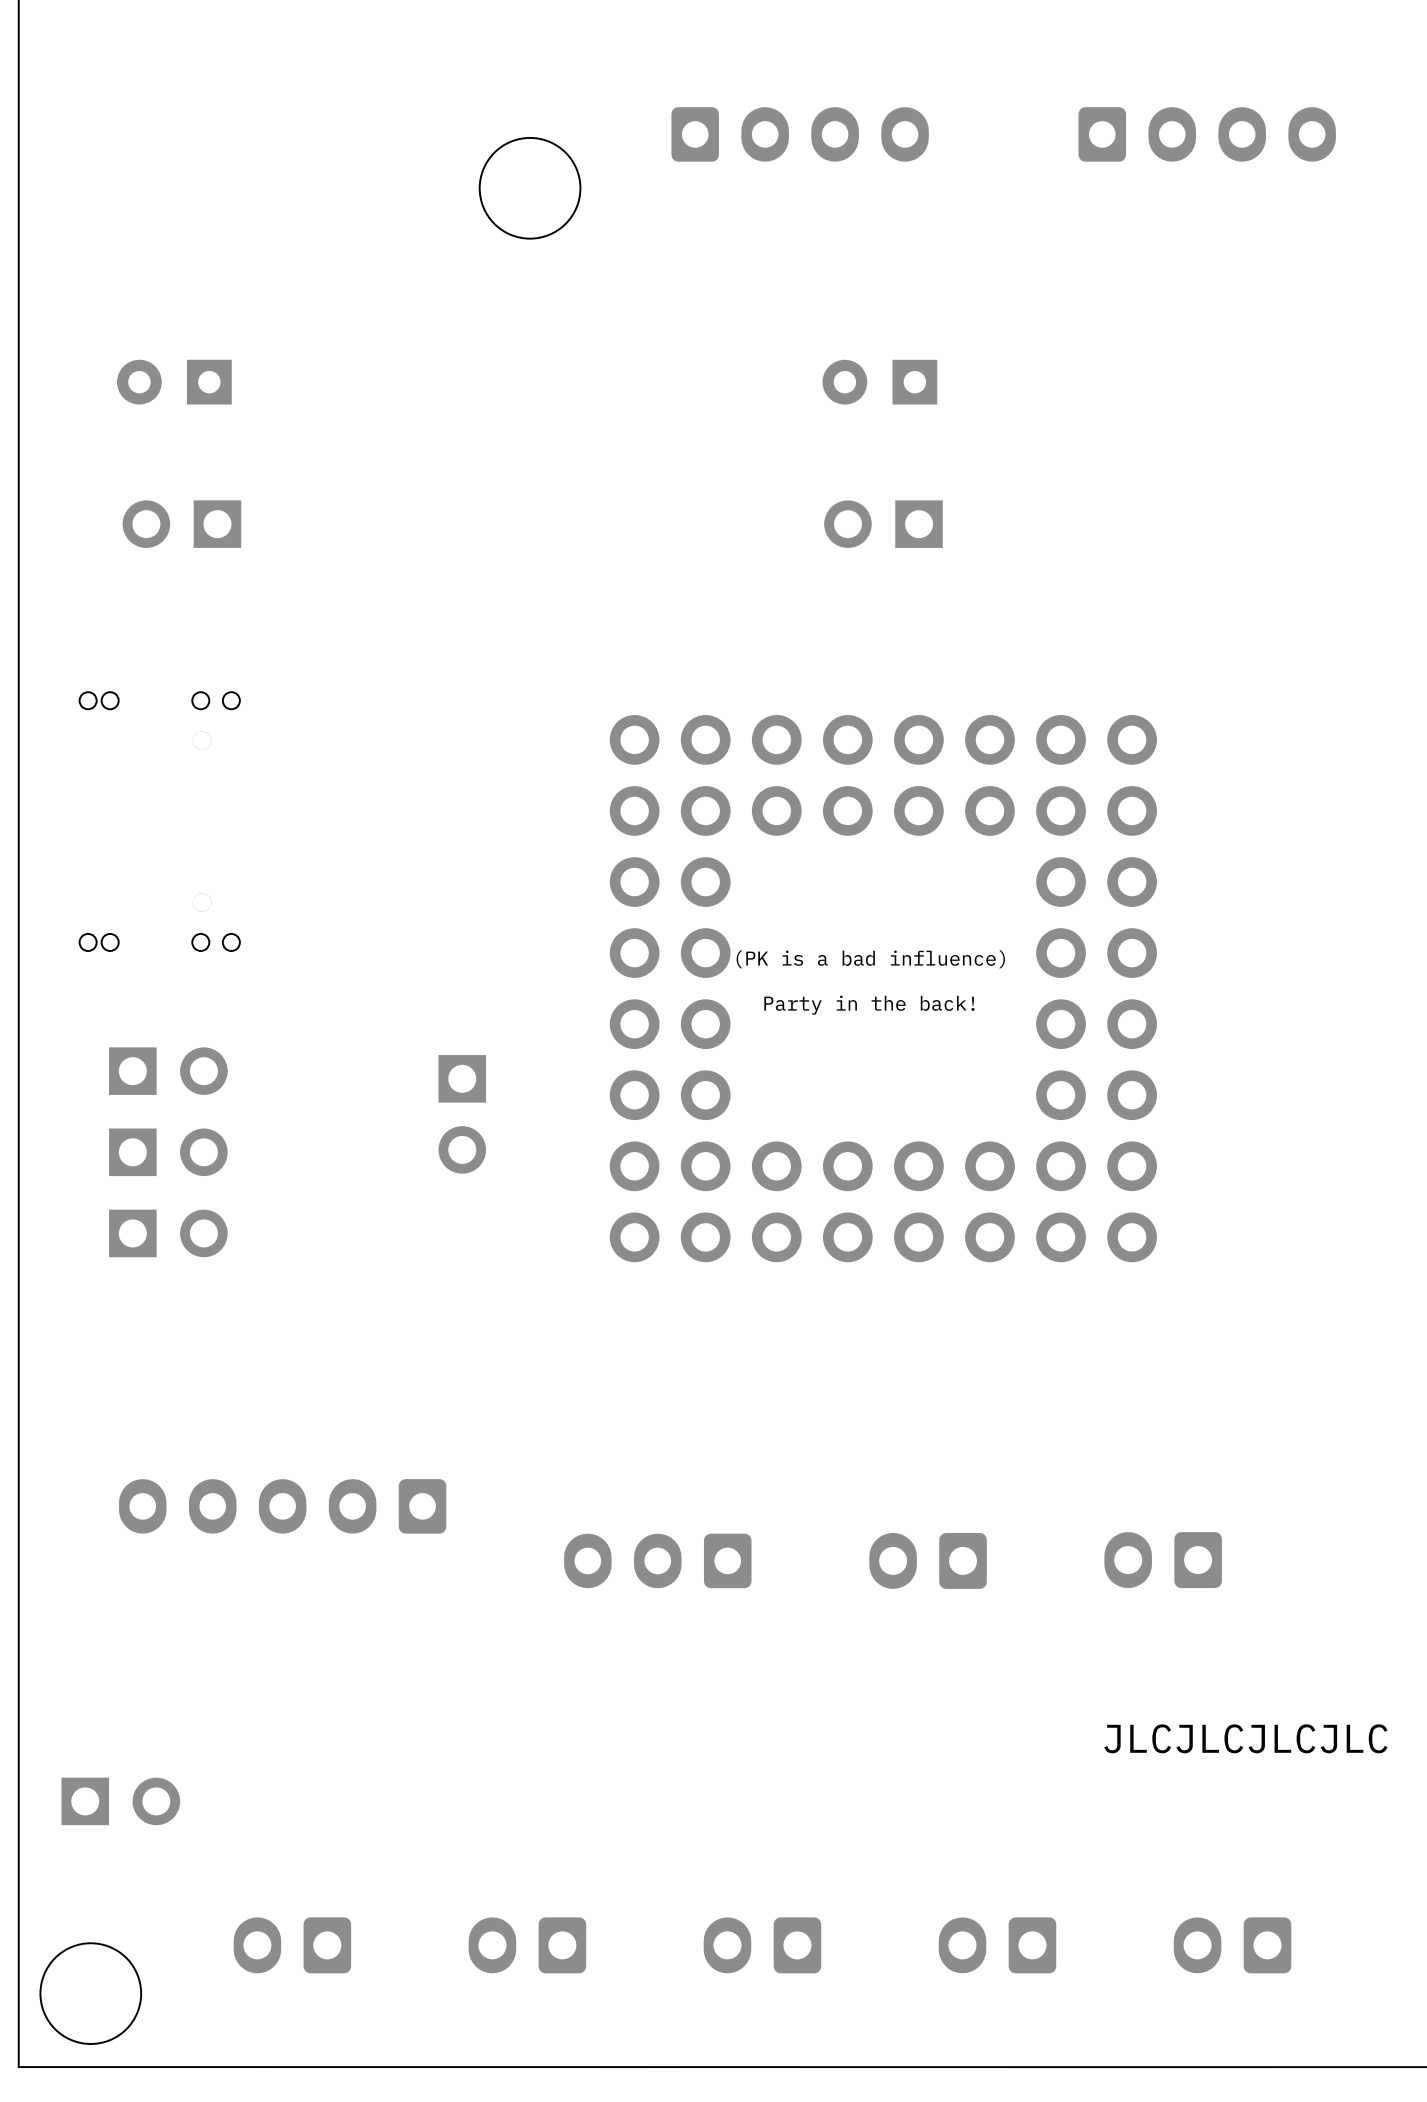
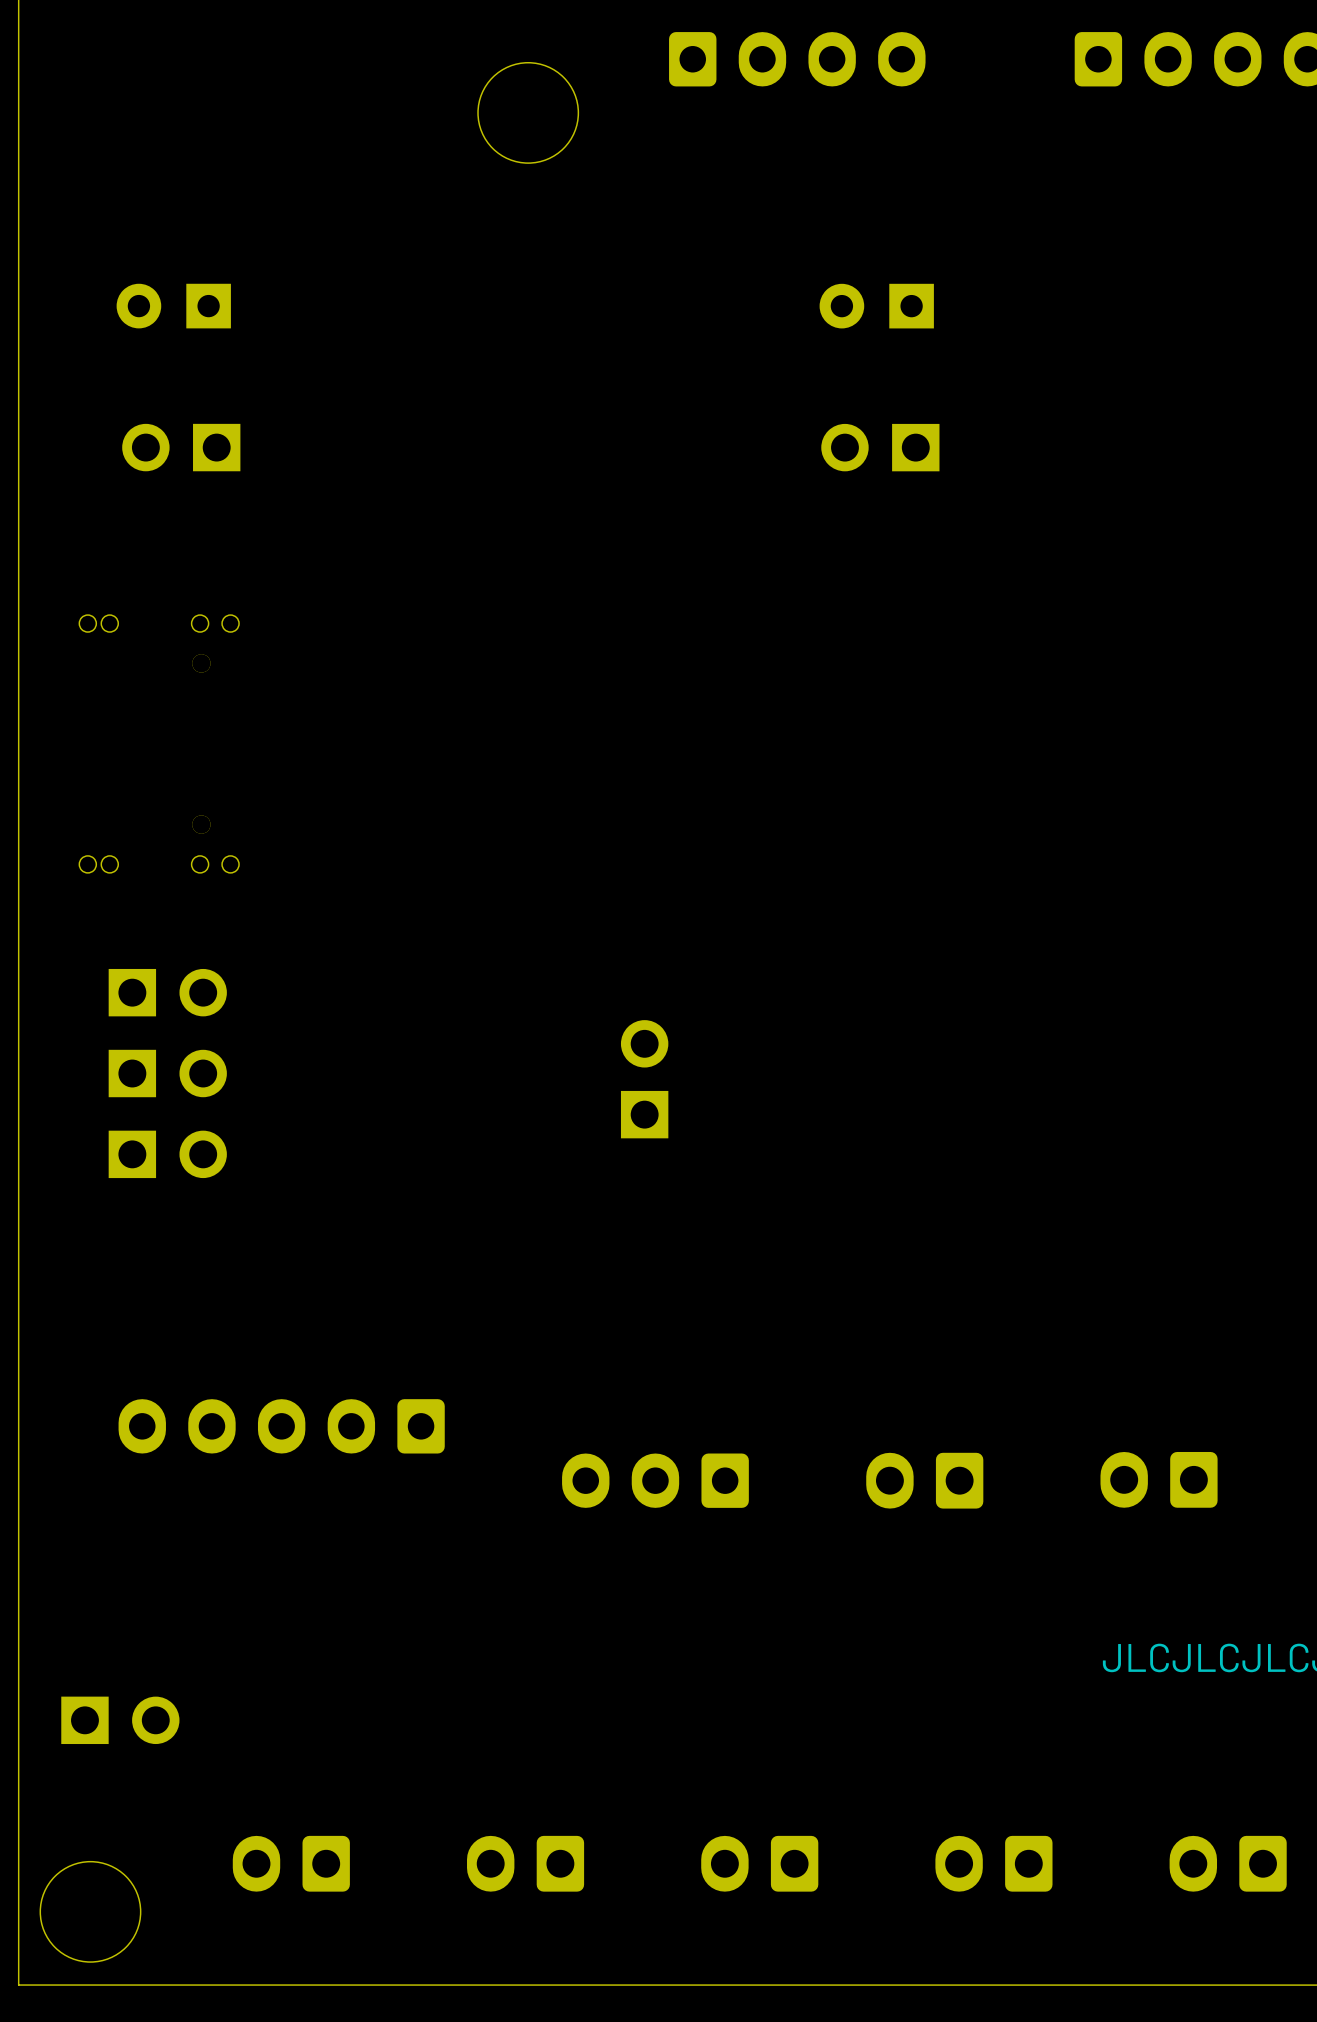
text: (PK is a bad influence) (870, 959) -> none
part: (883, 988) -> none
text: Party in the back! (869, 1005) -> none
part rotation: 0° (462, 1114) -> 180° (644, 1079)
part position: (462, 1114) -> (644, 1079)

